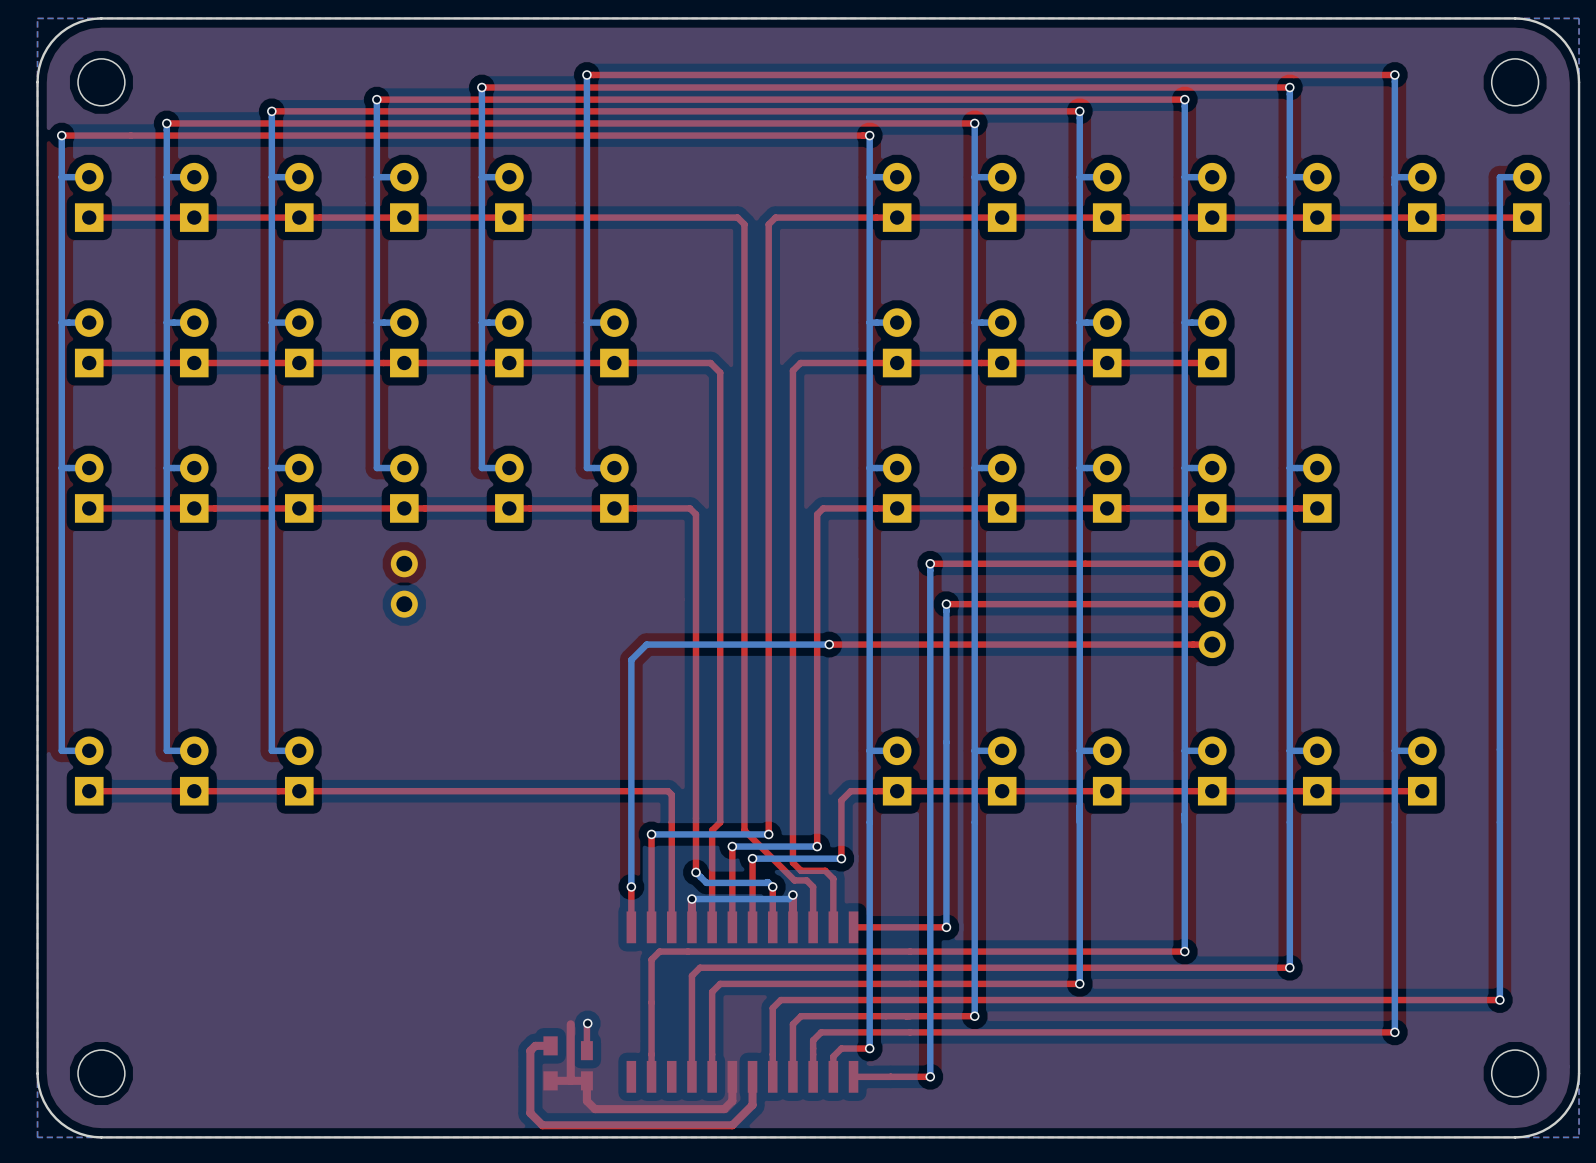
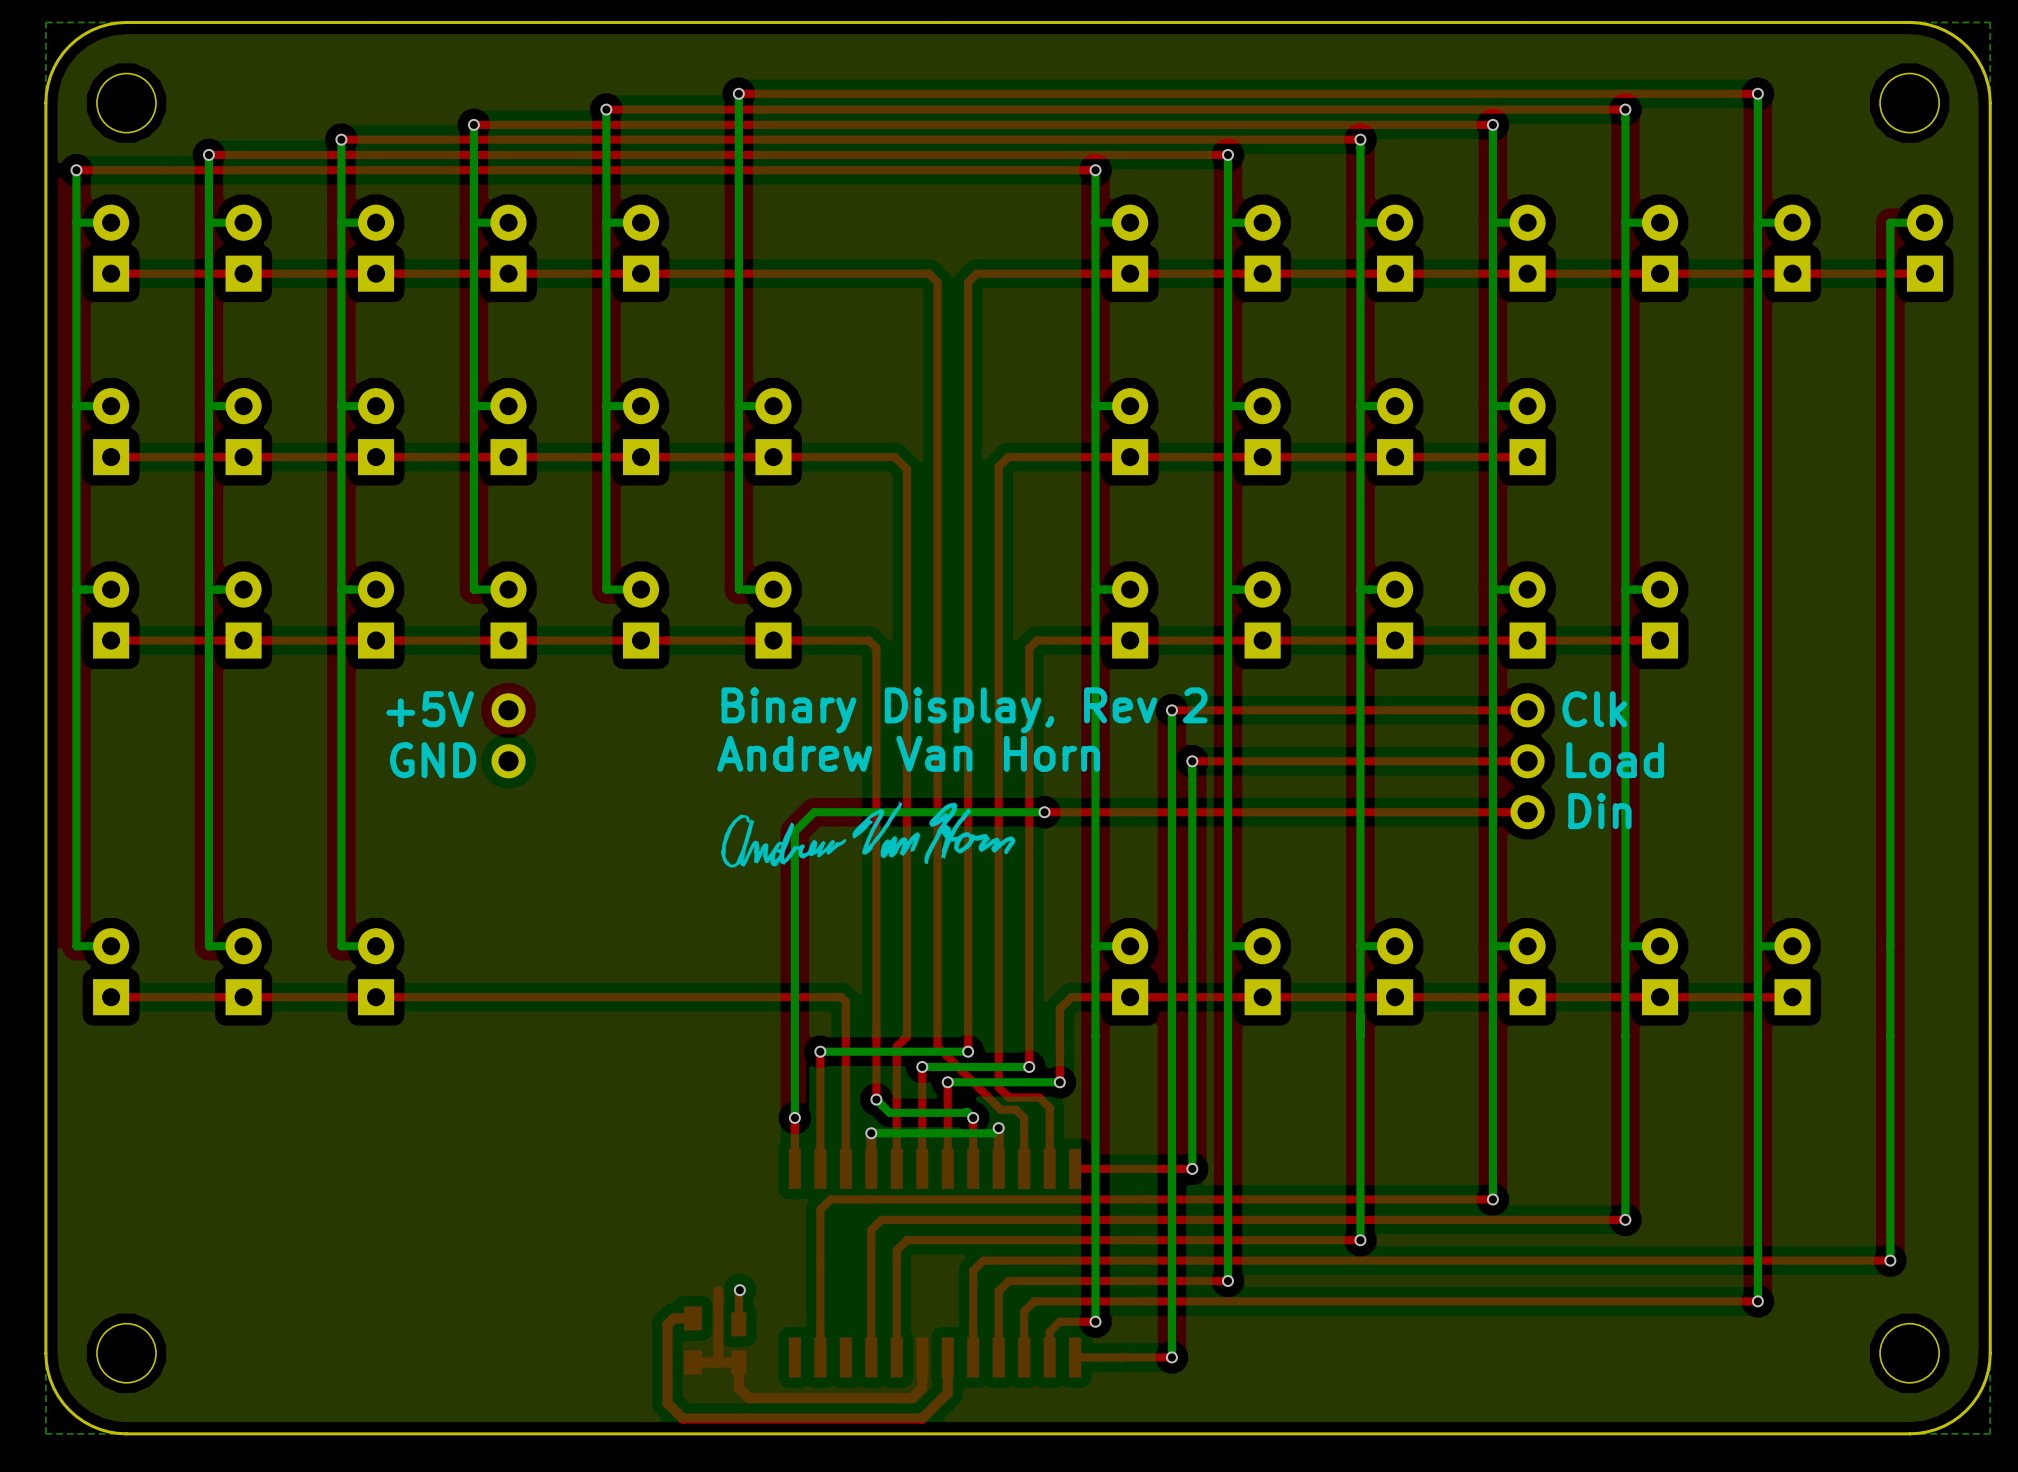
text: none -> Binary Display, Rev 2 (964, 710)
text: none -> Clk (1594, 709)
text: none -> +5V (430, 709)
text: none -> Andrew Van Horn (908, 753)
text: none -> Load (1615, 760)
text: none -> GND (433, 760)
drawing: none -> [720, 801, 1016, 868]
text: none -> Din (1599, 811)

